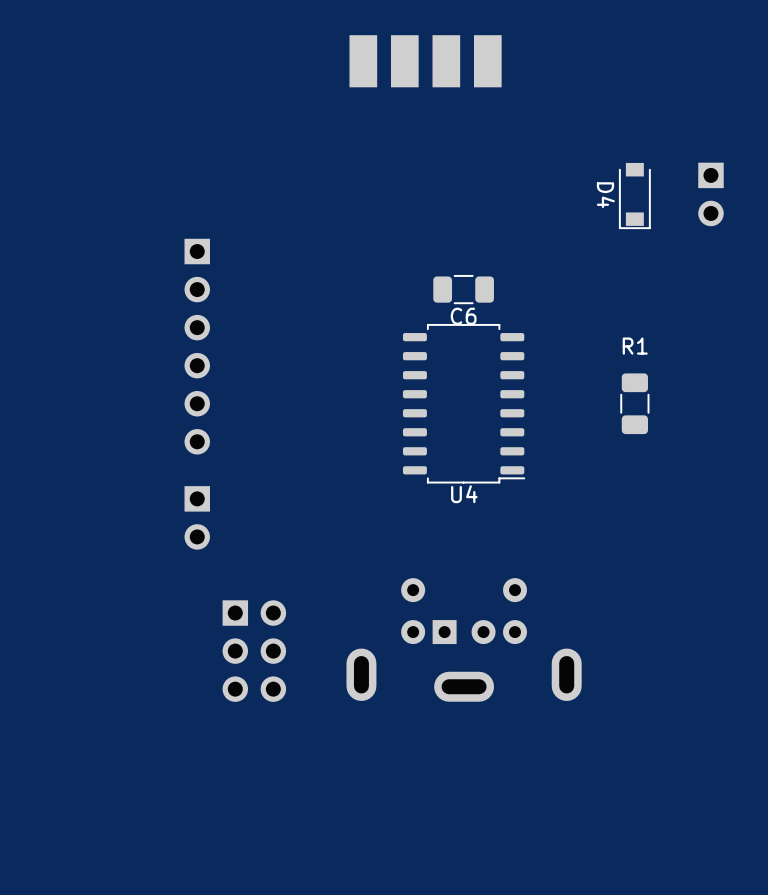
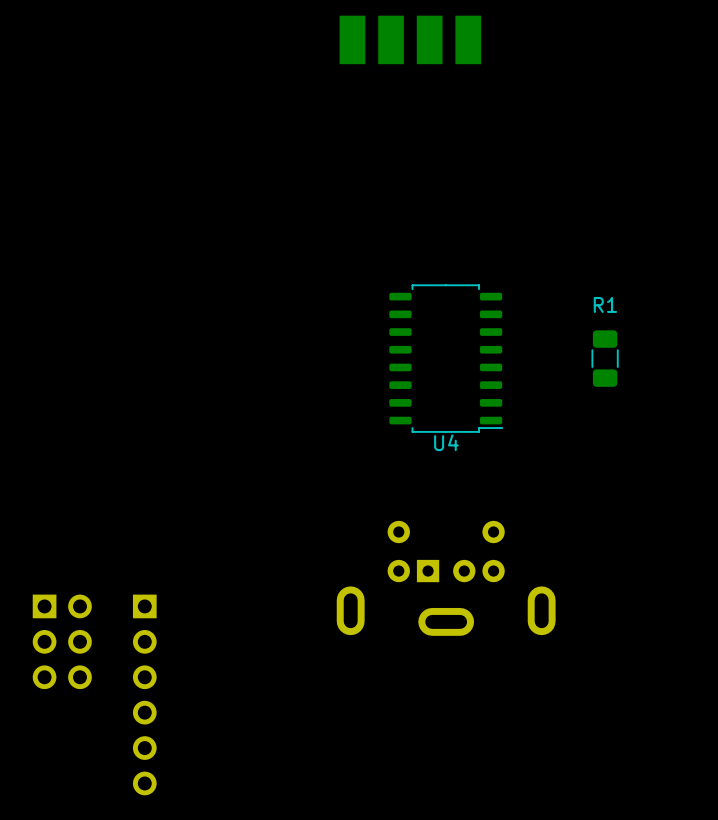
part: (710, 194) -> none
D4: (634, 196) -> none
C6: (463, 289) -> none
part: (197, 346) -> none
part: (197, 517) -> none
part position: (254, 651) -> (62, 641)
part: none -> (144, 694)

